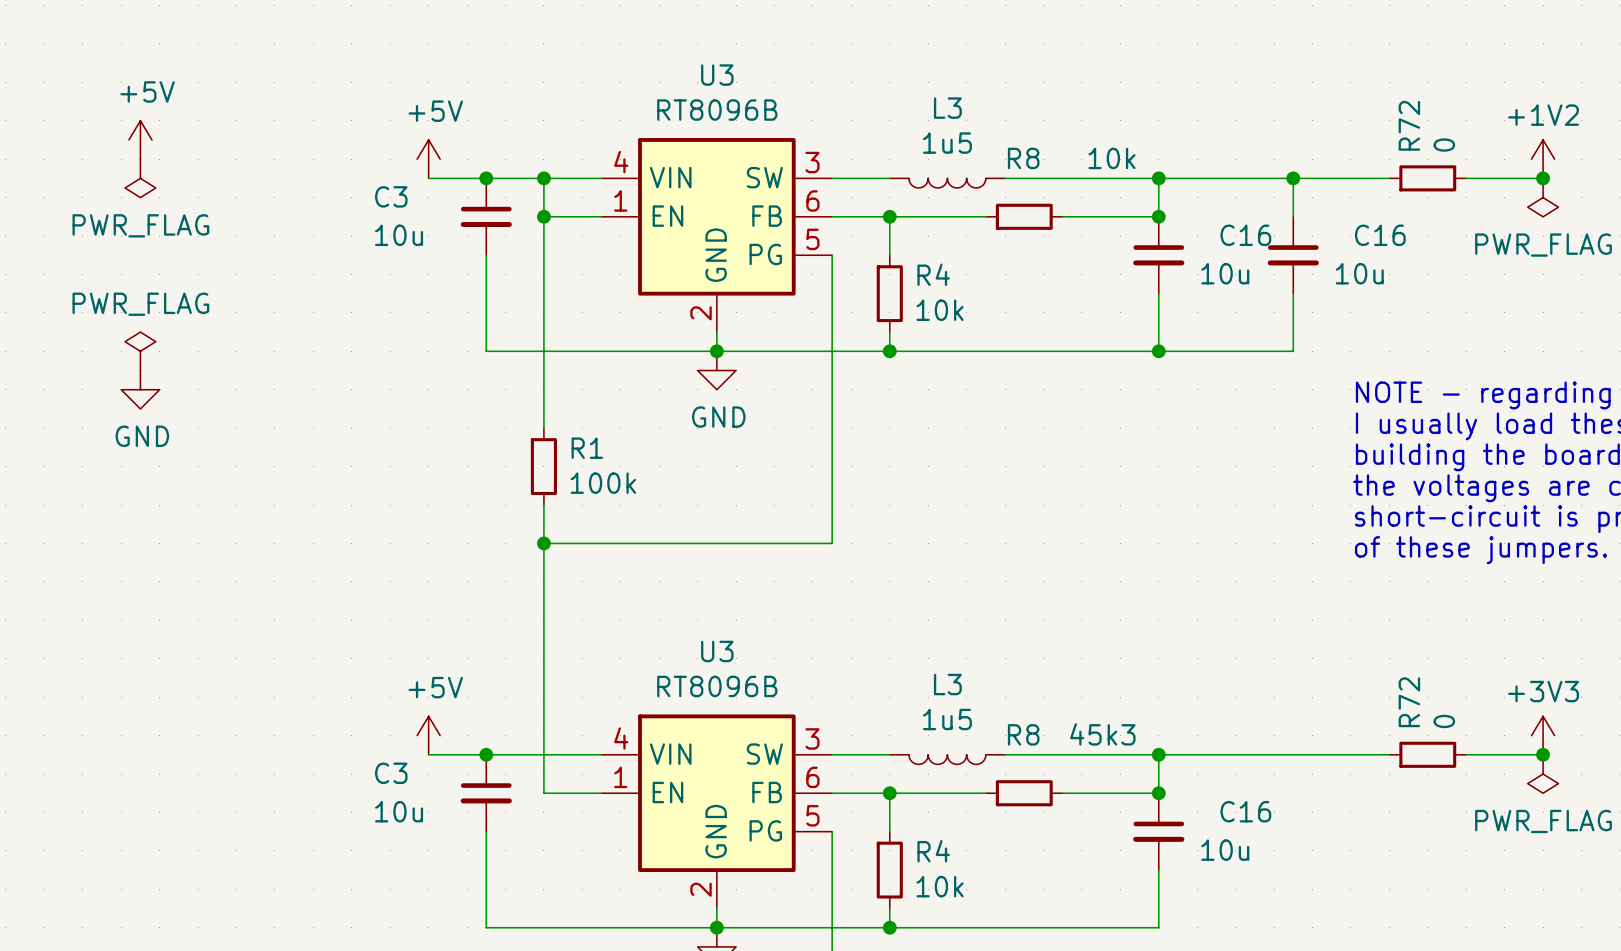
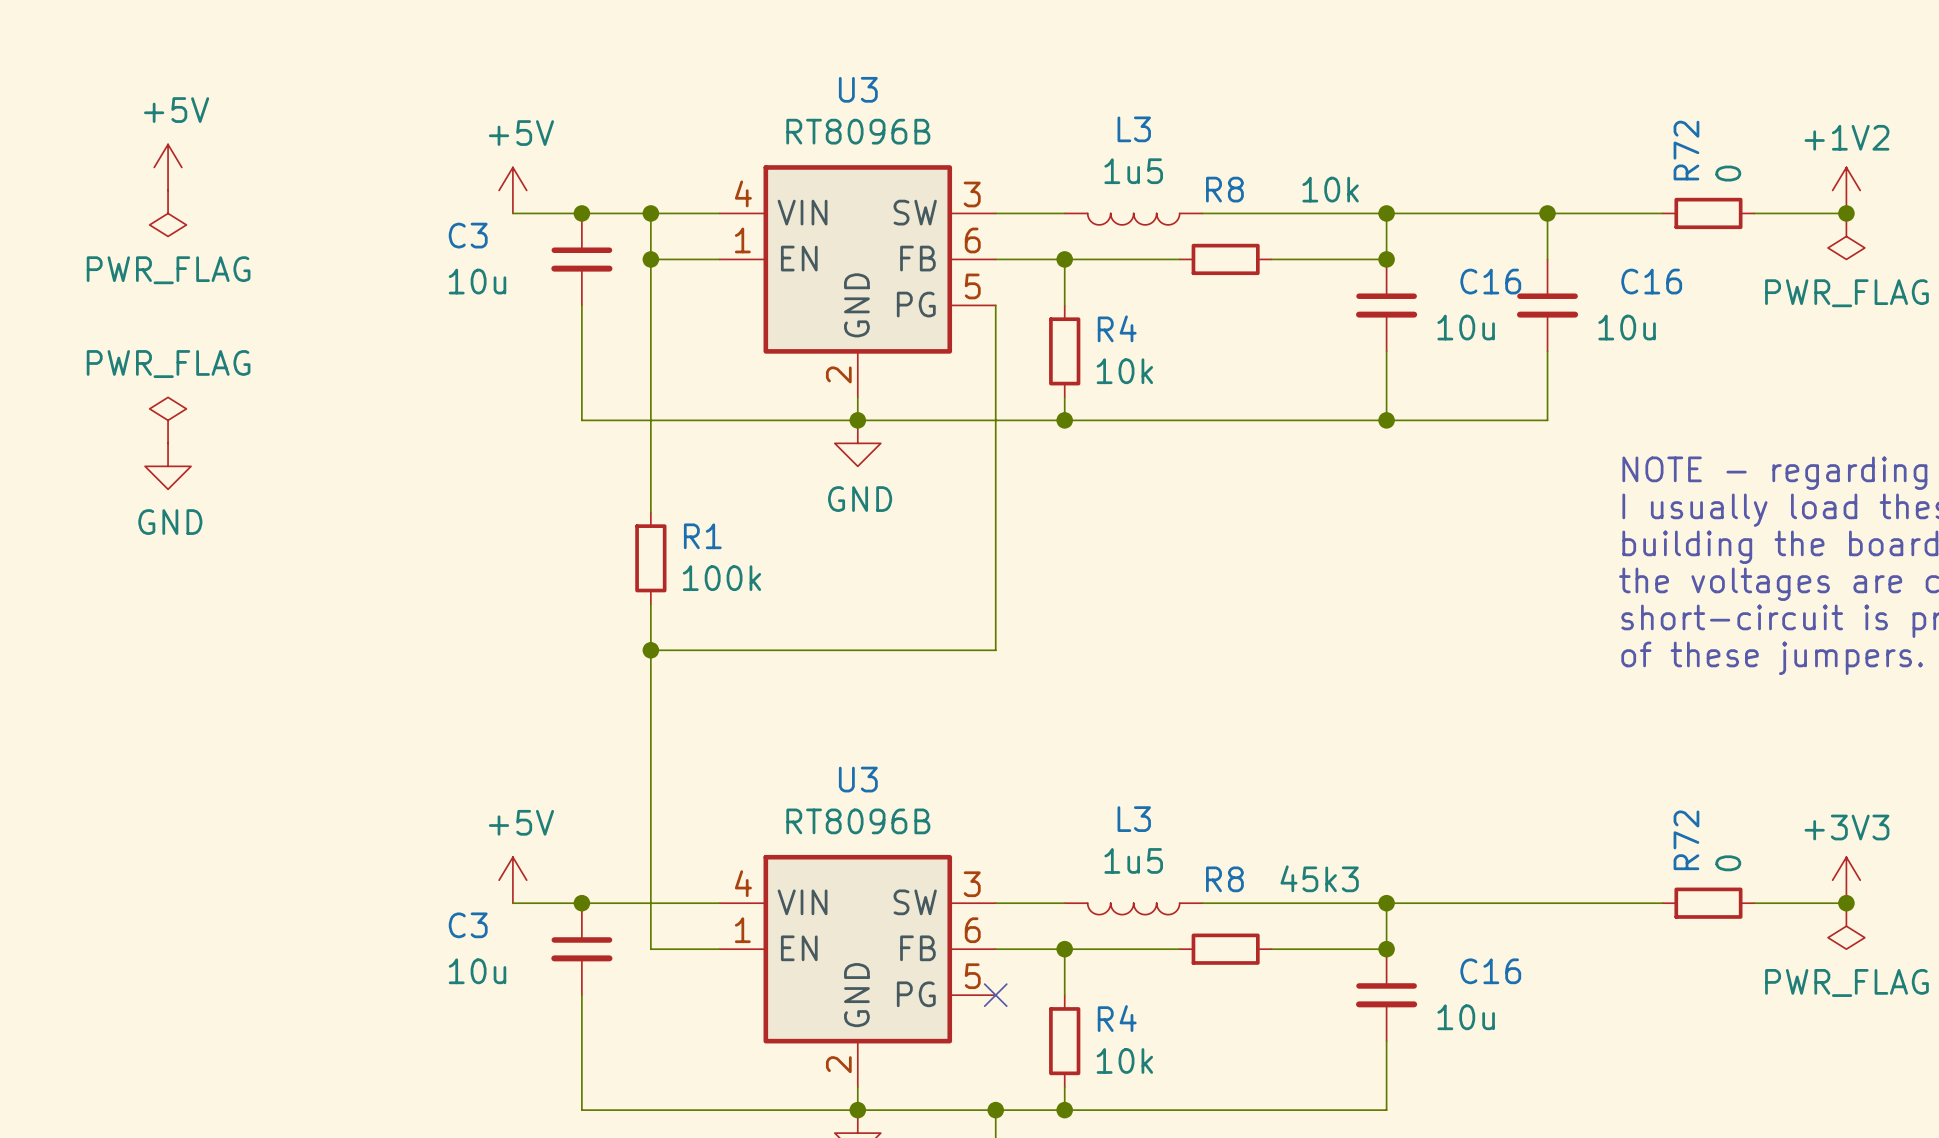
wire: (832, 831) (832, 927) -> none
no-connect mark: none -> (995, 995)
junction: none -> (995, 1110)

